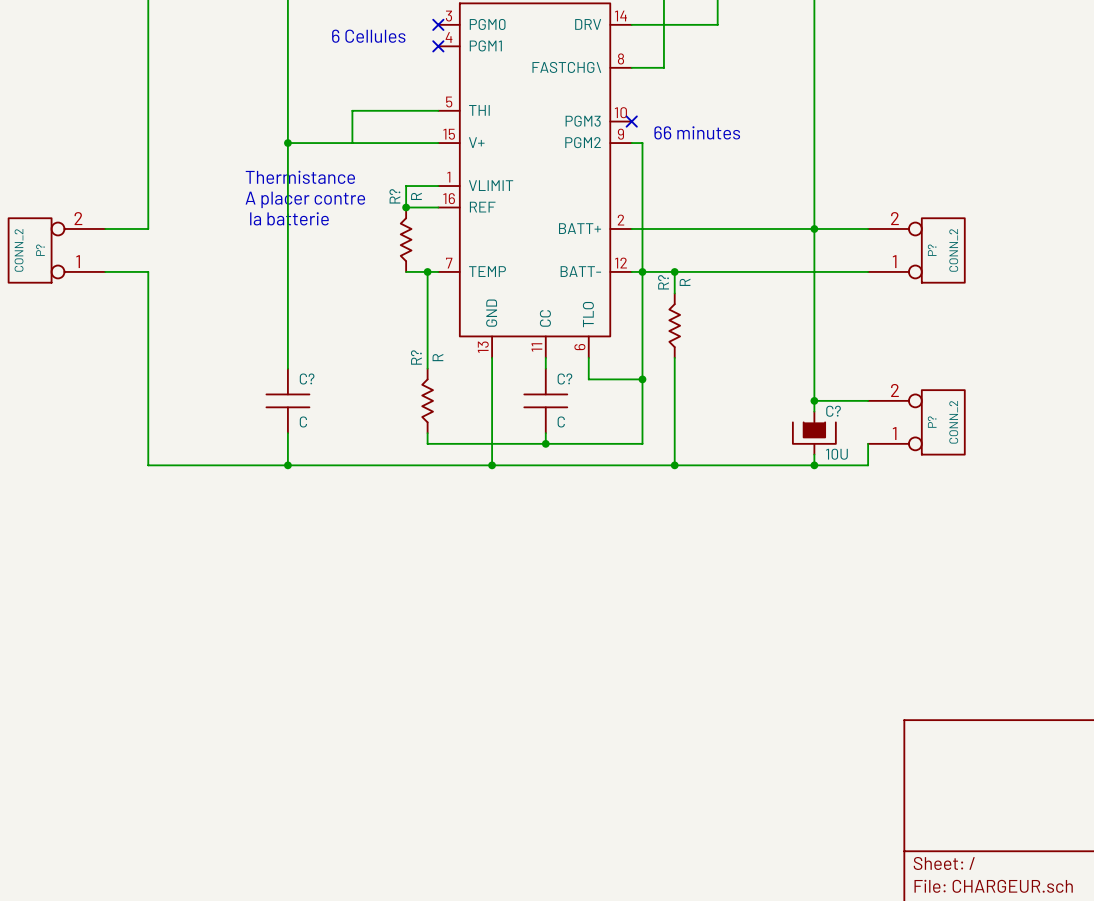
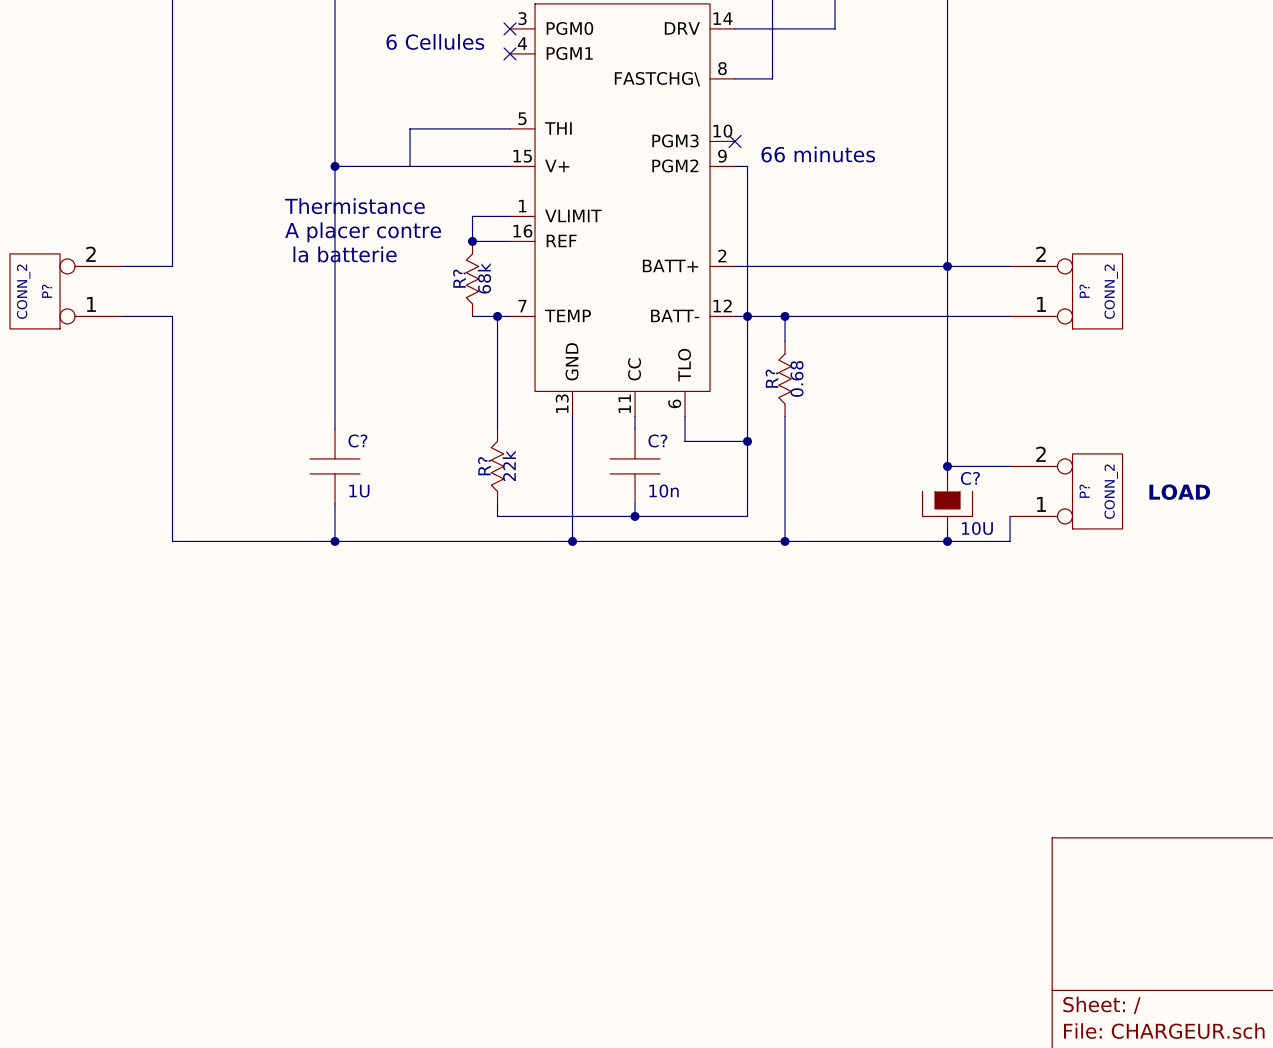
R? name position: R? (394, 196) -> R? (459, 278)
R? value: R (416, 196) -> 68k (484, 278)
R? name position: R? (663, 282) -> R? (771, 378)
R? value: R (685, 282) -> 0.68 (797, 378)
R? name position: R? (416, 357) -> R? (484, 466)
R? value: R (437, 357) -> 22k (509, 465)
C? value: C (303, 421) -> 1U (359, 491)
C? value: C (561, 421) -> 10n (664, 490)
text: none -> LOAD (1179, 492)

